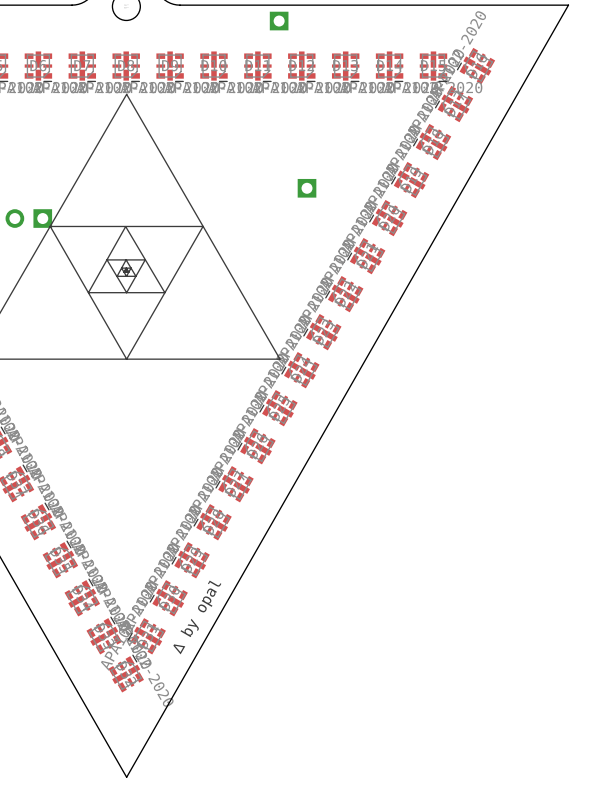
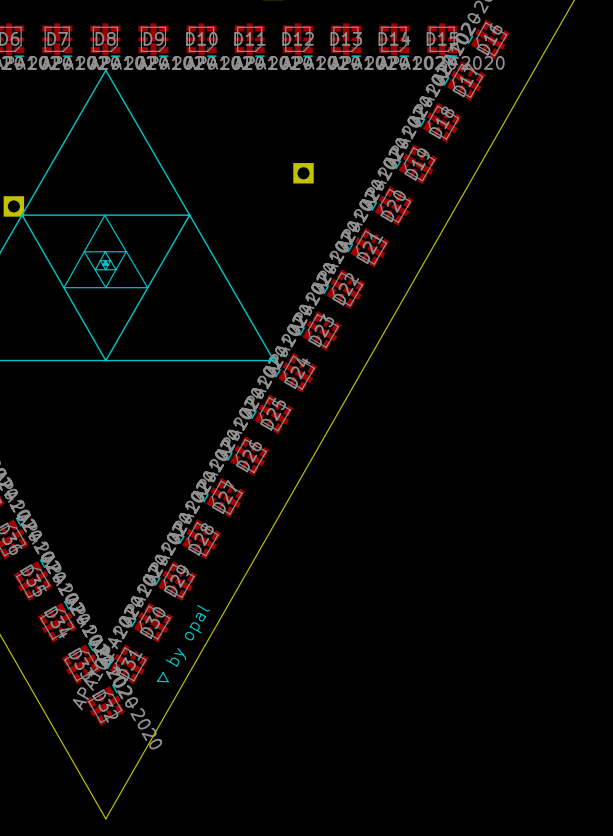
text: ∆ by opal (197, 617) -> by opal (187, 635)
line: none -> (163, 672) (157, 681) (168, 681) (163, 672)

